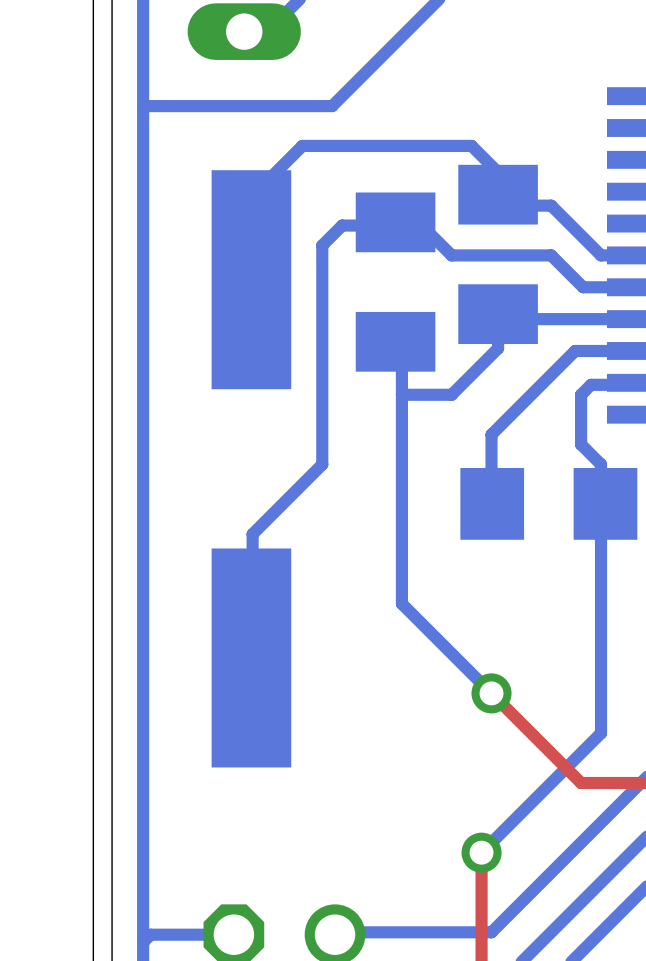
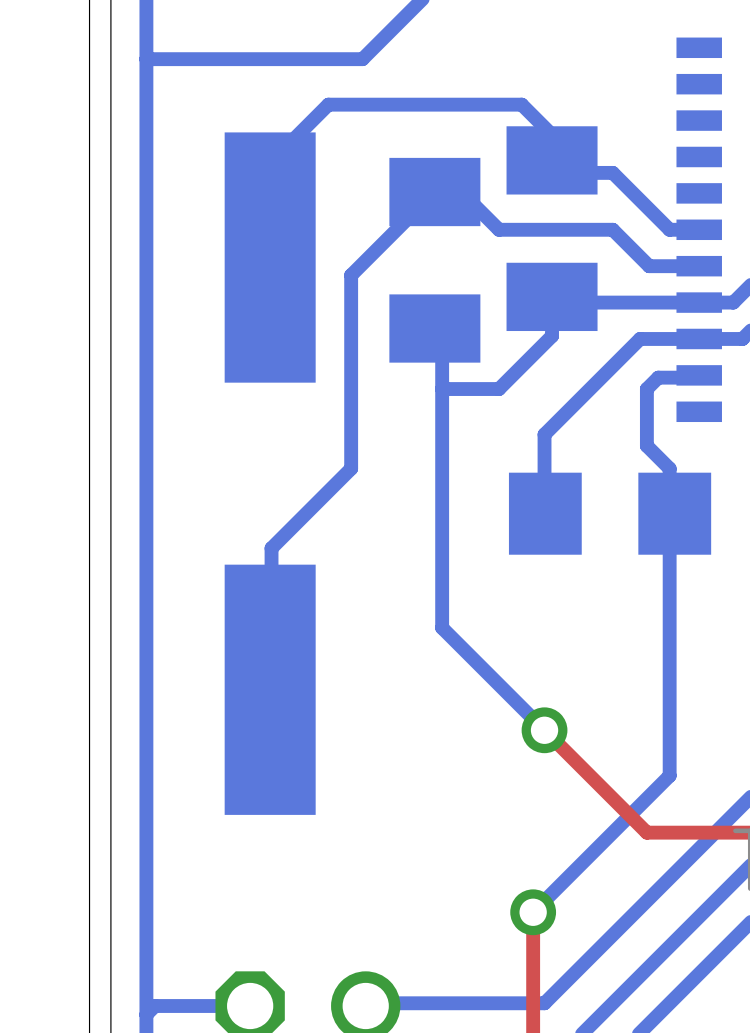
bottom track: (395, 222) (392, 225) (342, 225) (322, 245) (322, 295) -> (434, 192) (351, 275)

